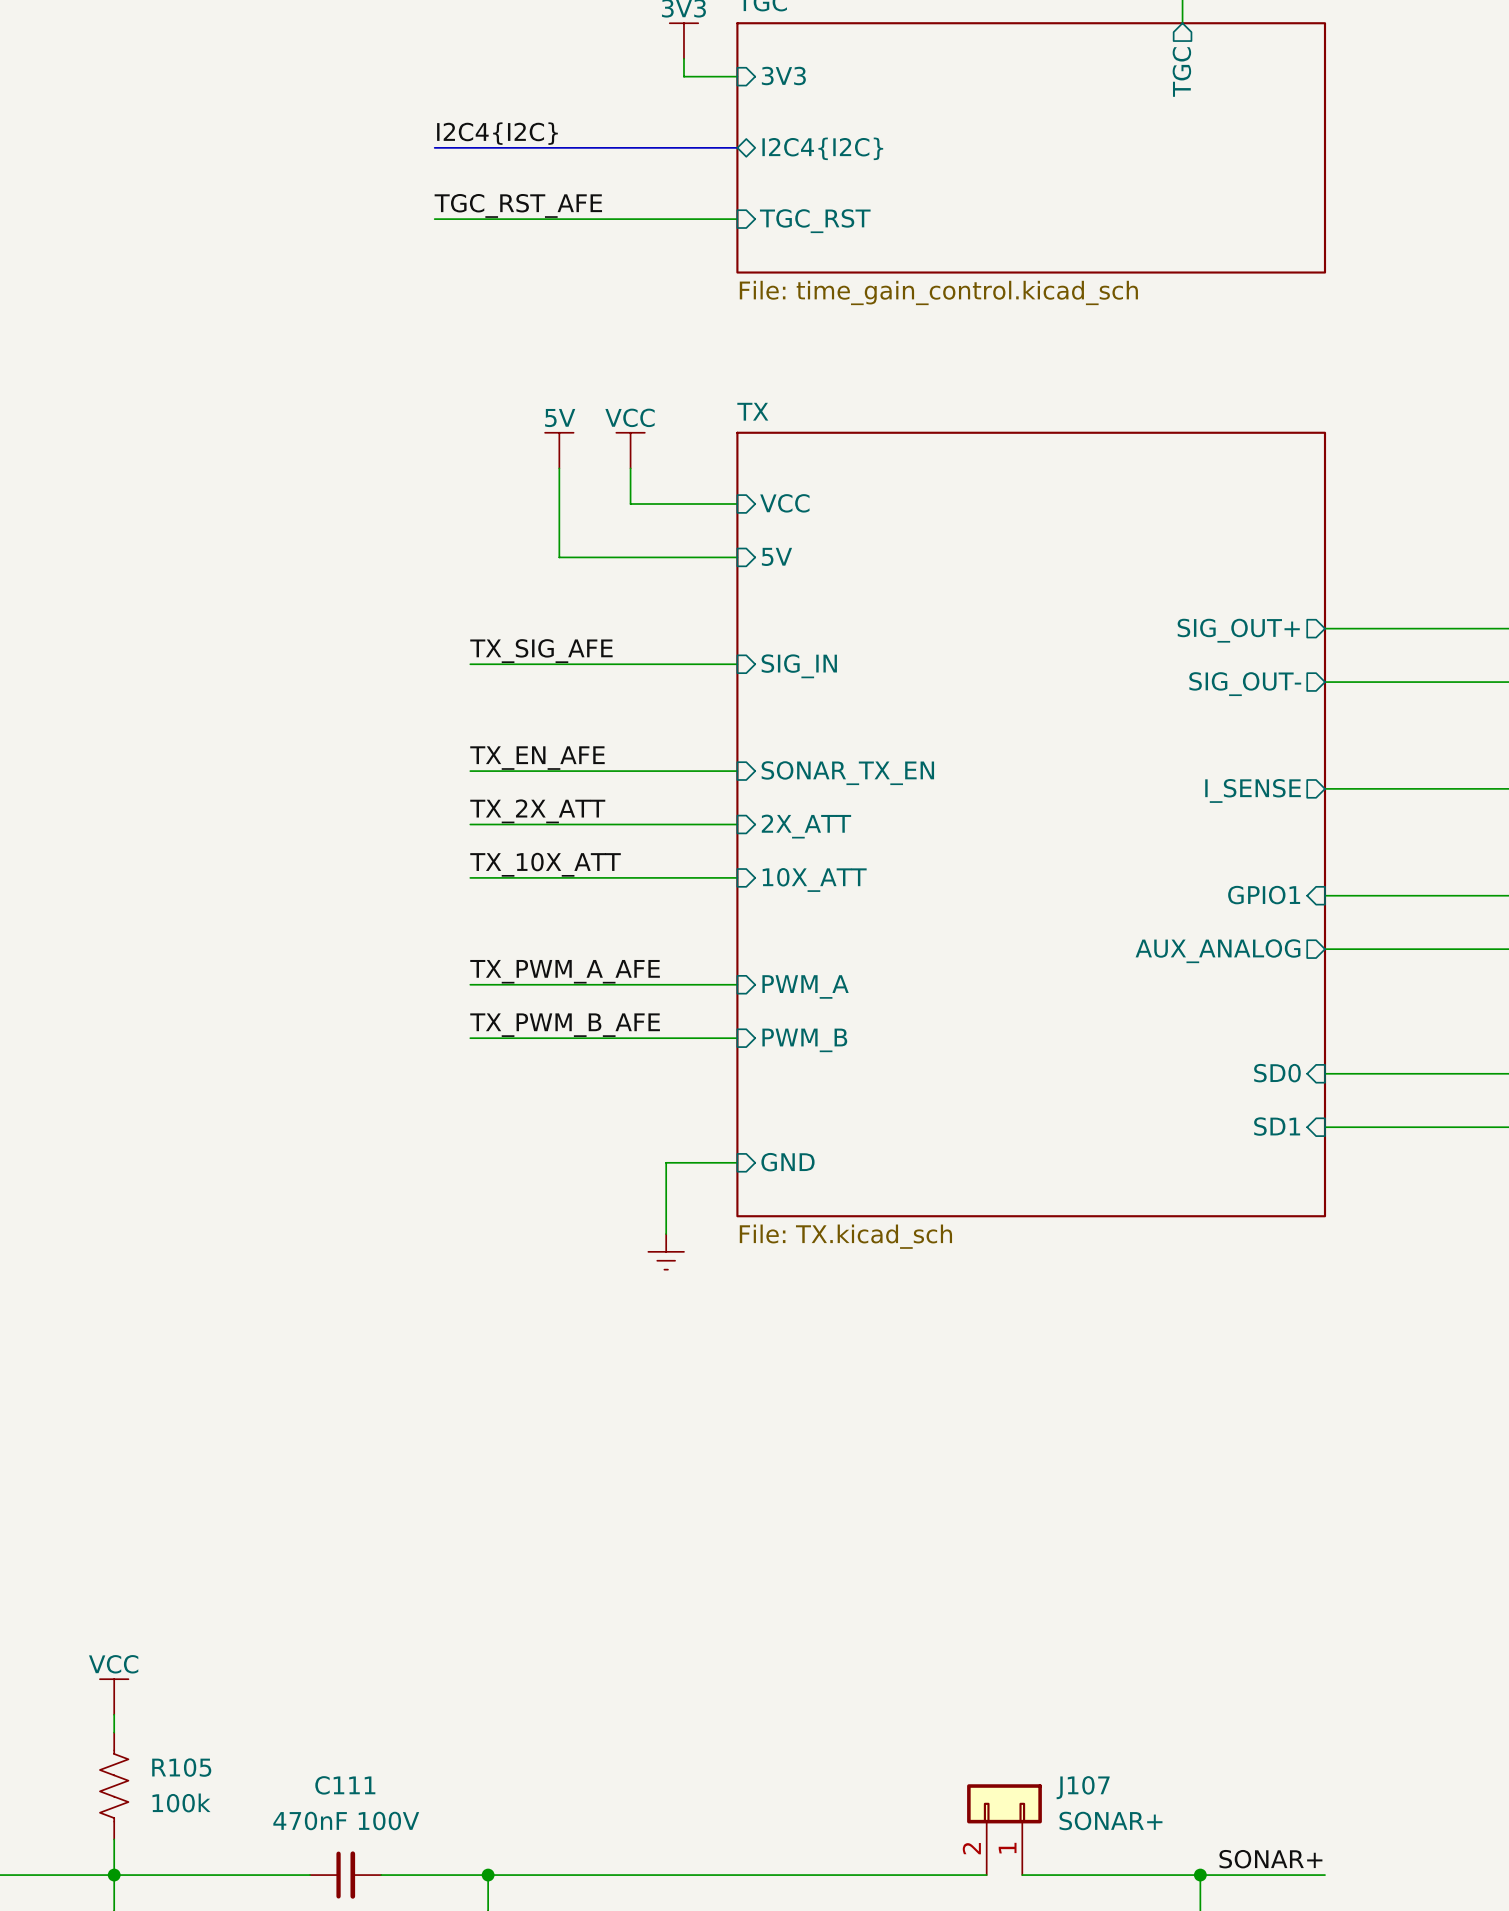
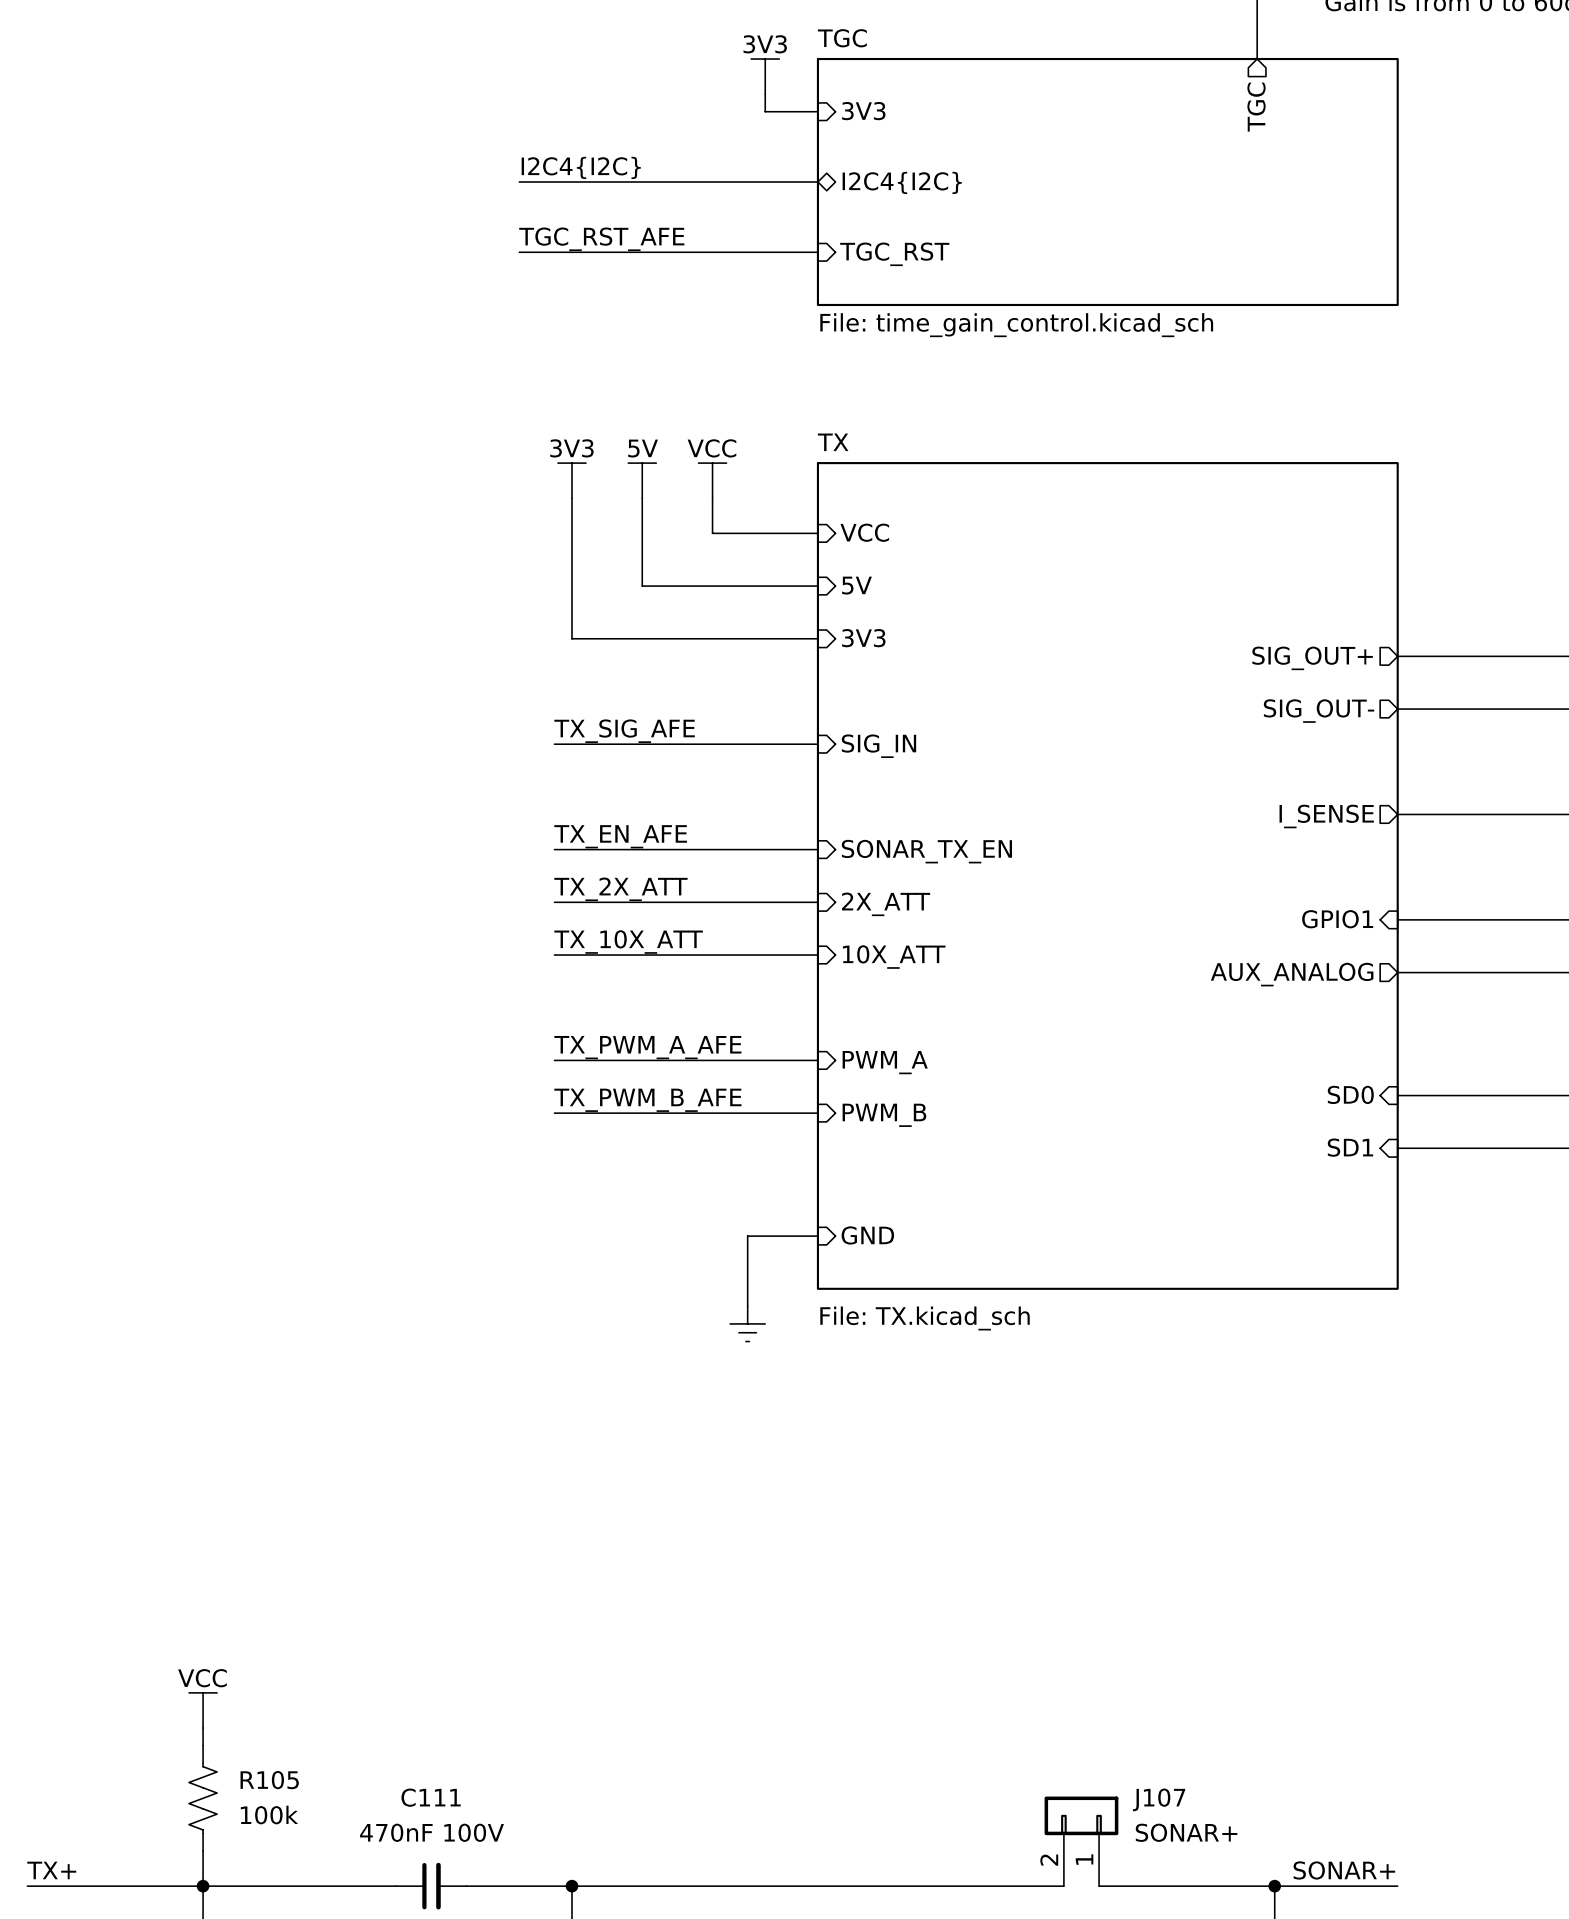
power symbol: none -> 3V3 (571, 480)
wire: none -> (571, 498) (571, 638) (817, 638)
sheet pin: none -> 3V3 (863, 638)
label position: TX_SIG_AFE (541, 651) -> TX_SIG_AFE (624, 731)
wire: (470, 664) (737, 664) -> none
sheet pin position: SIG_IN (799, 666) -> SIG_IN (879, 746)
label: TX_EN_AFE (537, 758) -> none
wire: (470, 771) (737, 771) -> (554, 744) (817, 744)
sheet pin: SONAR_TX_EN (847, 773) -> none
label: TX_2X_ATT (537, 811) -> TX_EN_AFE (620, 836)
sheet TX: File: TX.kicad_sch (1031, 824) -> none
sheet pin: 2X_ATT (806, 826) -> SONAR_TX_EN (926, 851)
sheet TX: none -> File: TX.kicad_sch (1107, 875)
label: TX_10X_ATT (545, 864) -> TX_2X_ATT (620, 889)
sheet pin: 10X_ATT (814, 879) -> 2X_ATT (886, 904)
label: none -> TX_10X_ATT (628, 942)
sheet pin: none -> 10X_ATT (894, 957)
label: TX_PWM_A_AFE (565, 971) -> none
wire: (470, 984) (737, 984) -> (554, 955) (817, 955)
sheet pin: PWM_A (805, 986) -> none
label: TX_PWM_B_AFE (565, 1025) -> TX_PWM_A_AFE (647, 1047)
sheet pin: PWM_B (804, 1040) -> PWM_A (885, 1062)
label: none -> TX_PWM_B_AFE (647, 1100)
wire: none -> (554, 1113) (817, 1113)
sheet pin: none -> PWM_B (884, 1115)
wire: (737, 1162) (666, 1162) (666, 1216) -> (817, 1236) (747, 1236)
sheet pin position: GND (787, 1162) -> GND (867, 1235)
wire: none -> (747, 1253) (747, 1306)
power symbol position: (666, 1251) -> (747, 1323)

